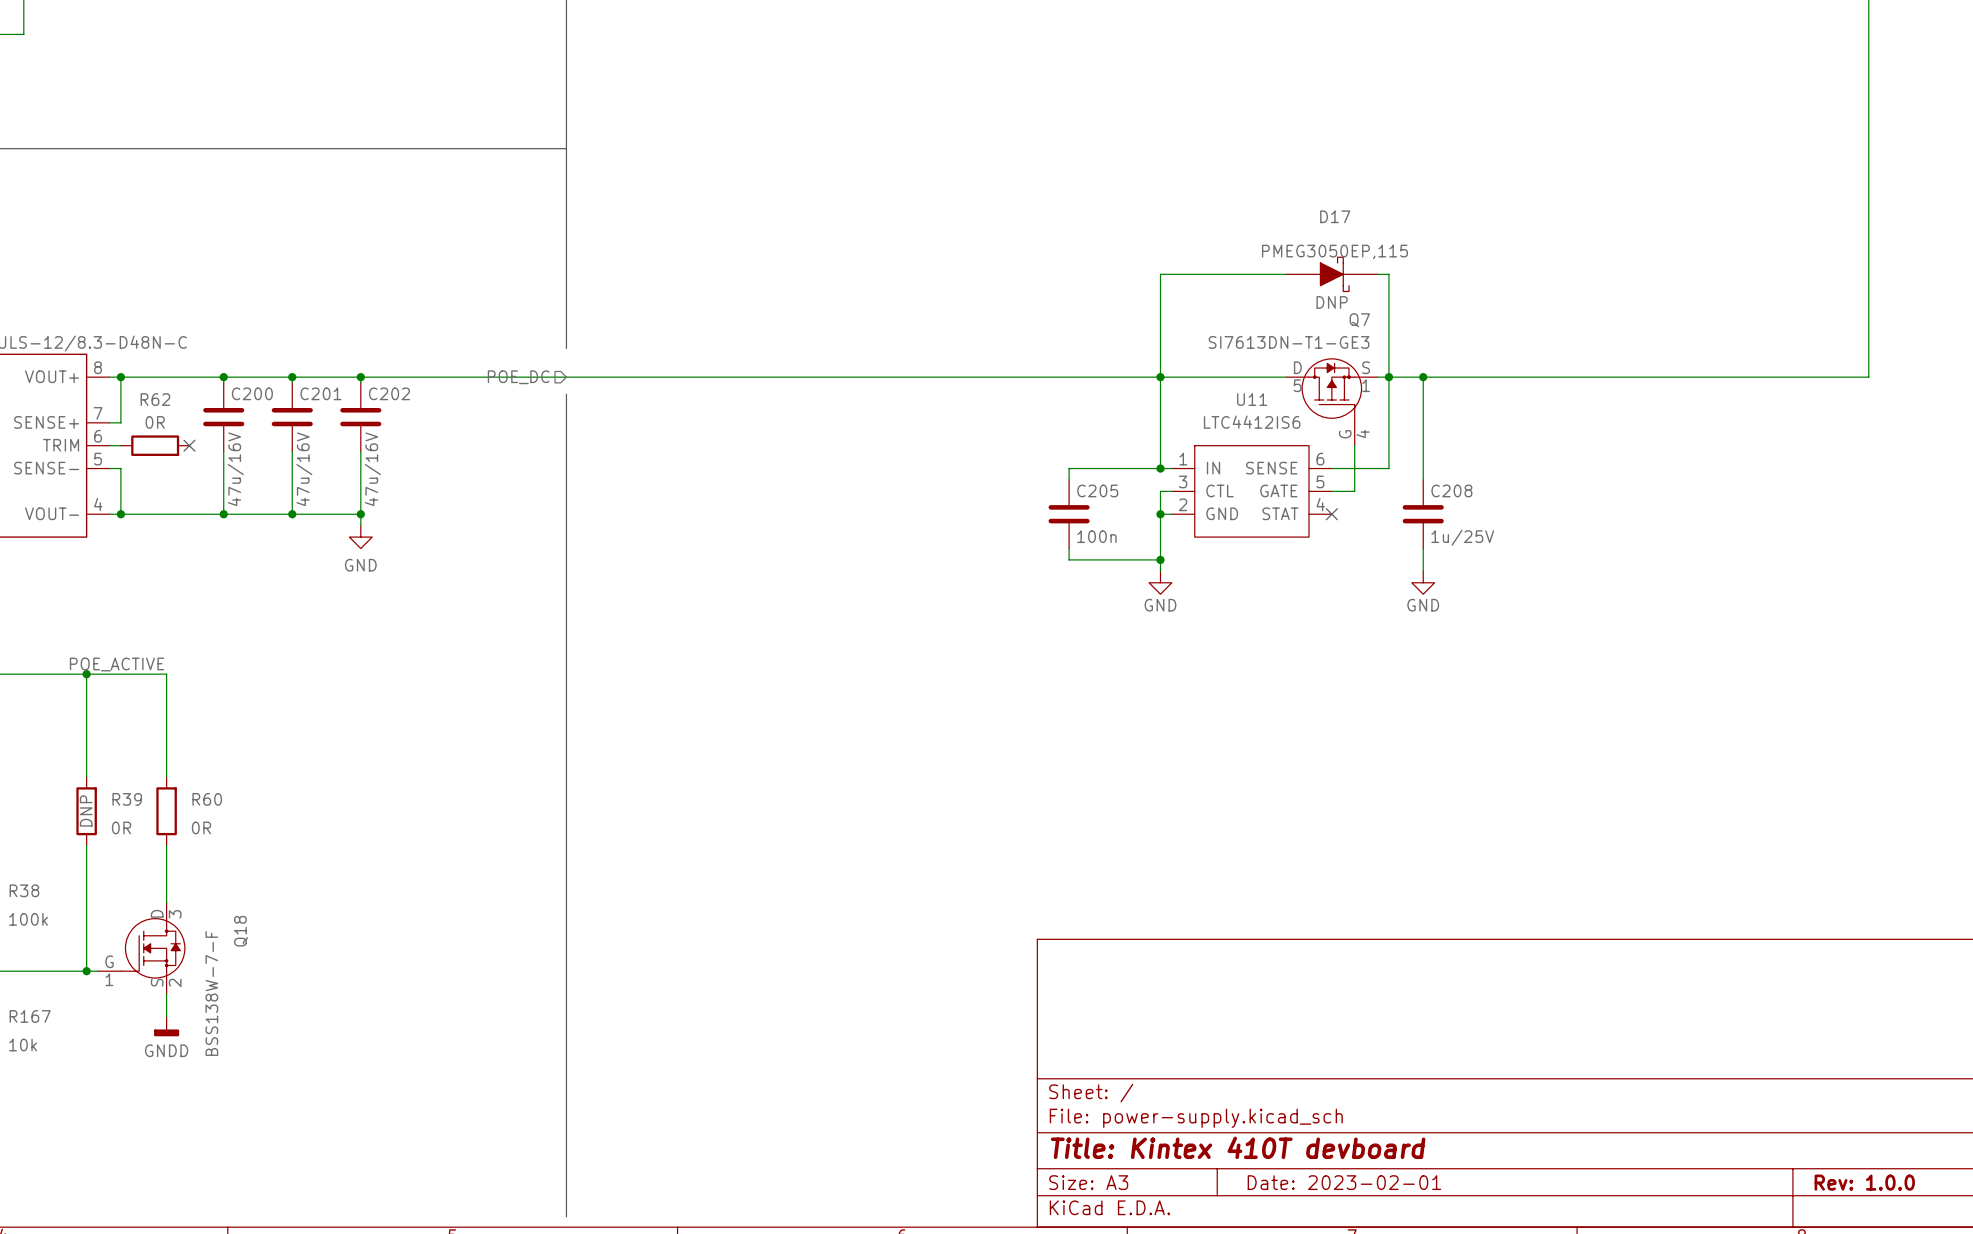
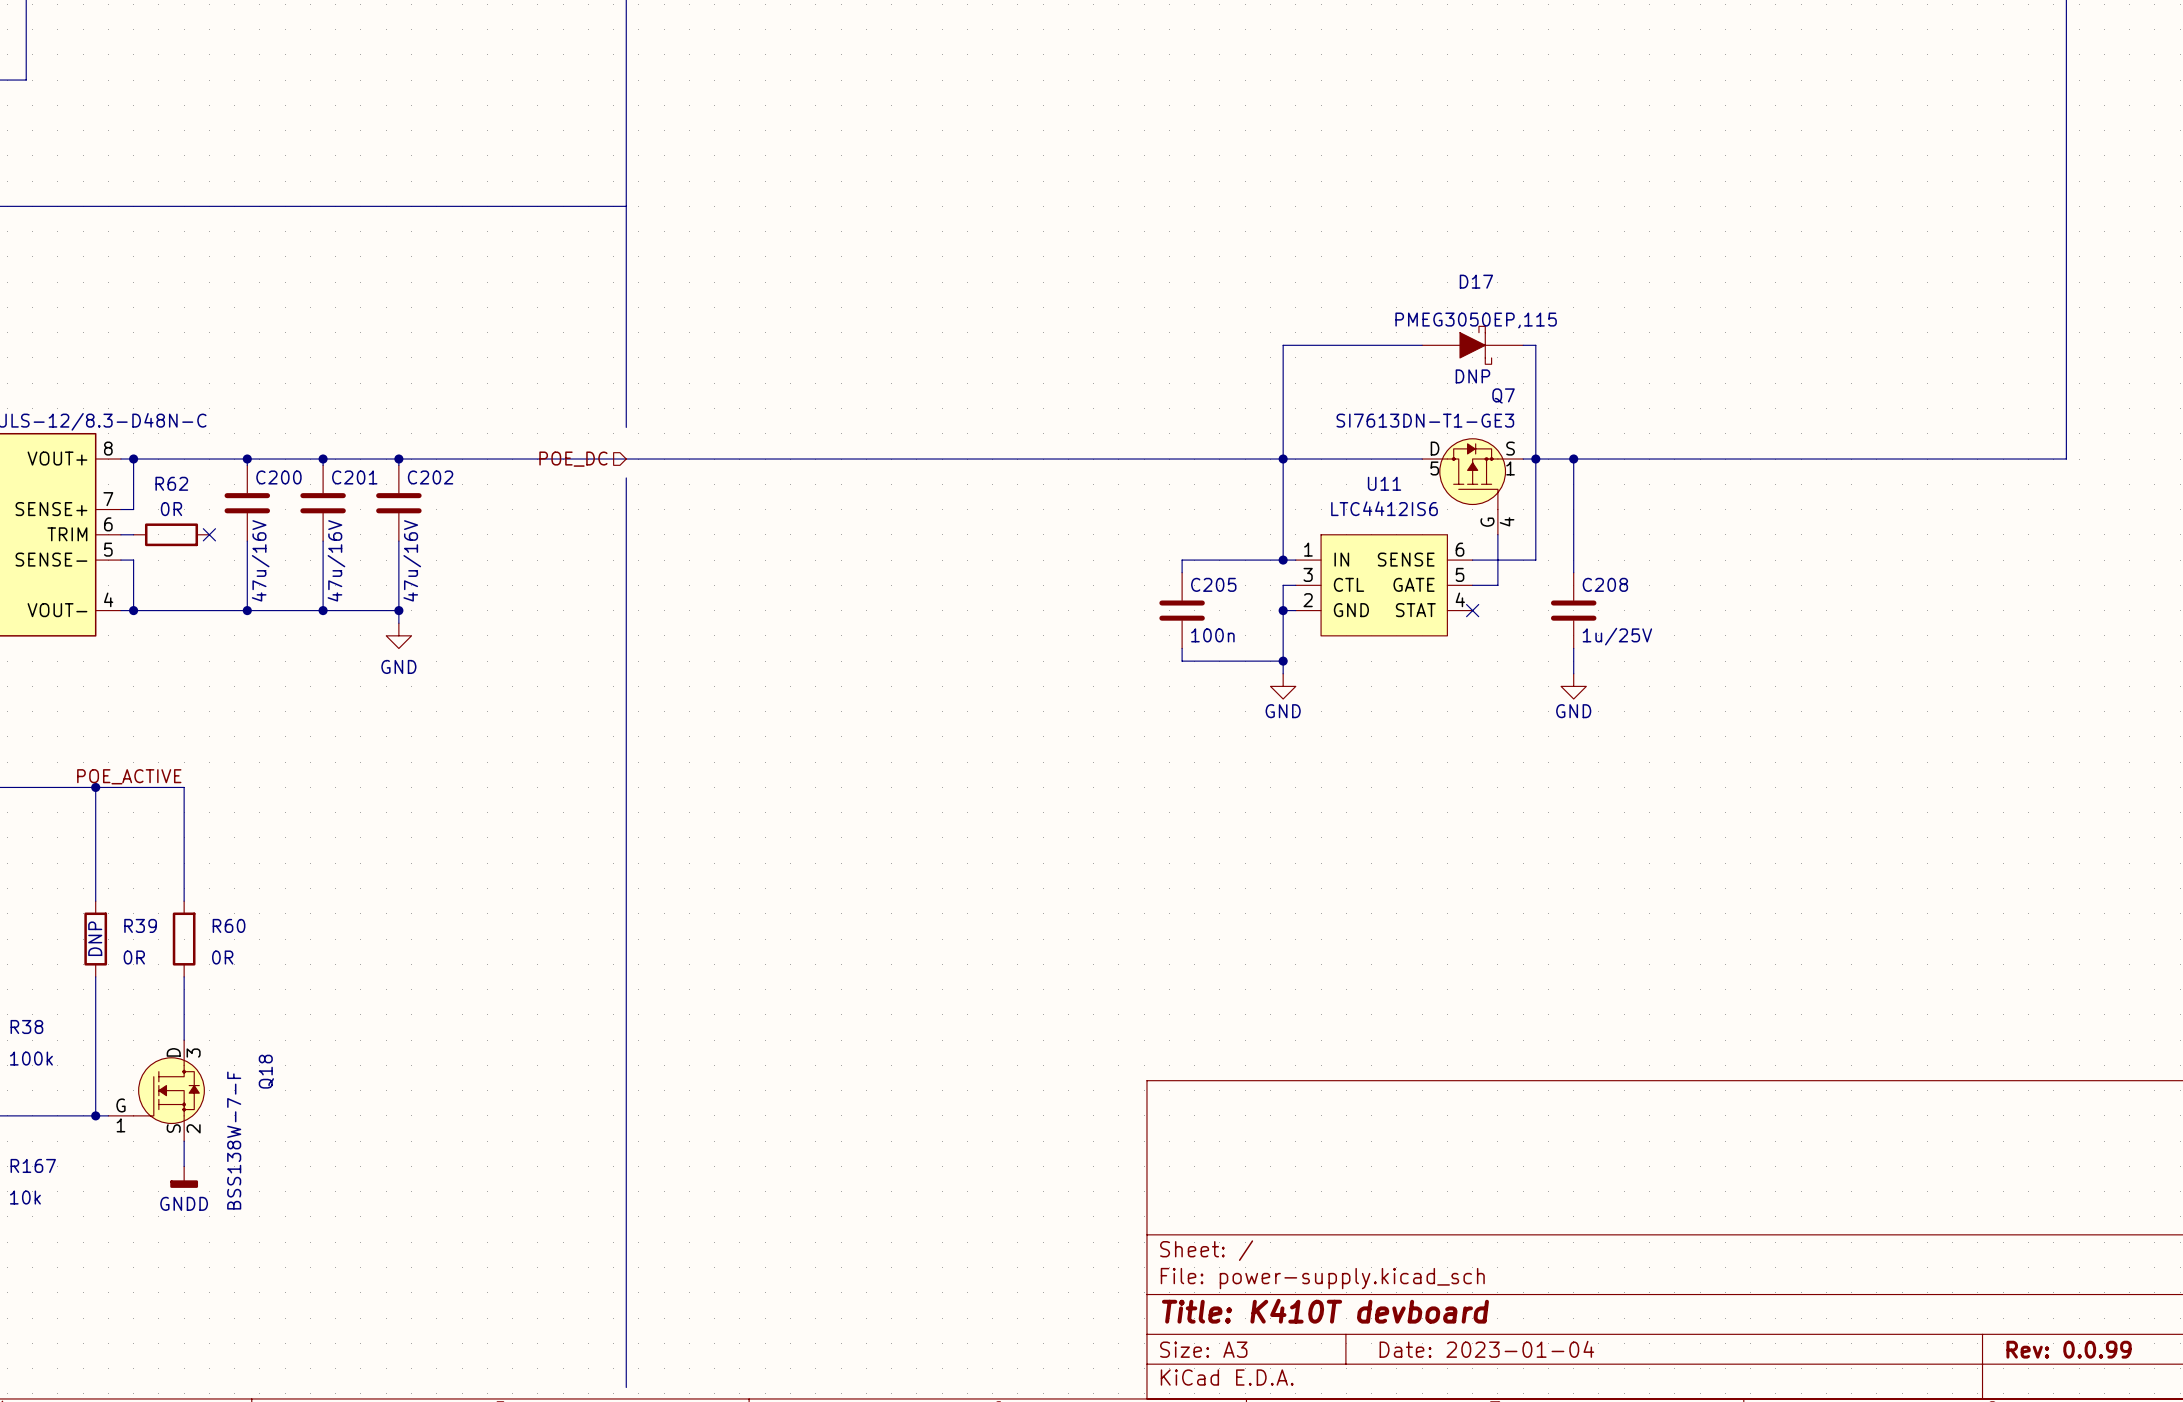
title block: Title: Kintex 410T devboard (1238, 1147) -> Title: K410T devboard (1325, 1311)
title block: Date: 2023-02-01 (1344, 1182) -> Date: 2023-01-04 (1486, 1349)
title block: Rev: 1.0.0 (1864, 1182) -> Rev: 0.0.99 (2069, 1349)

